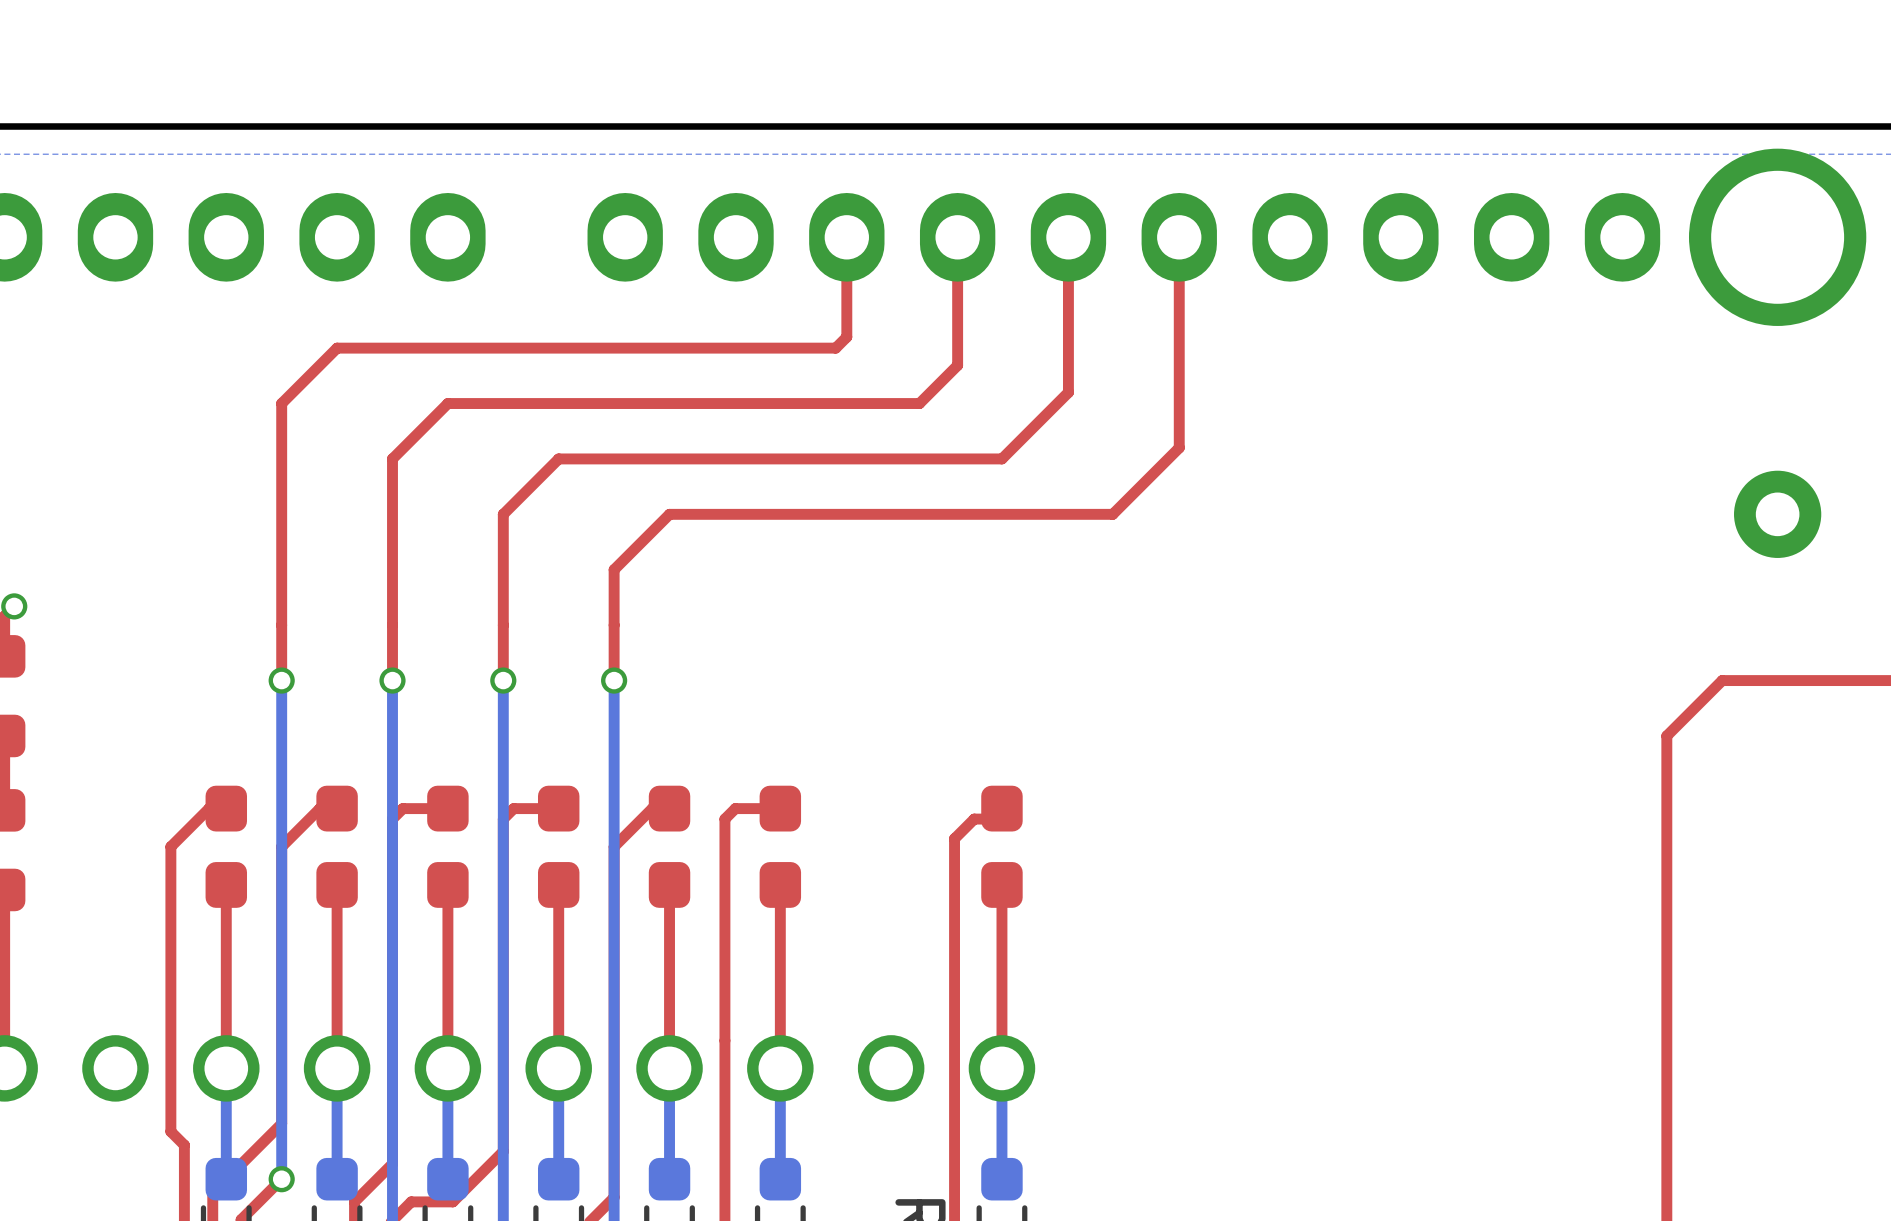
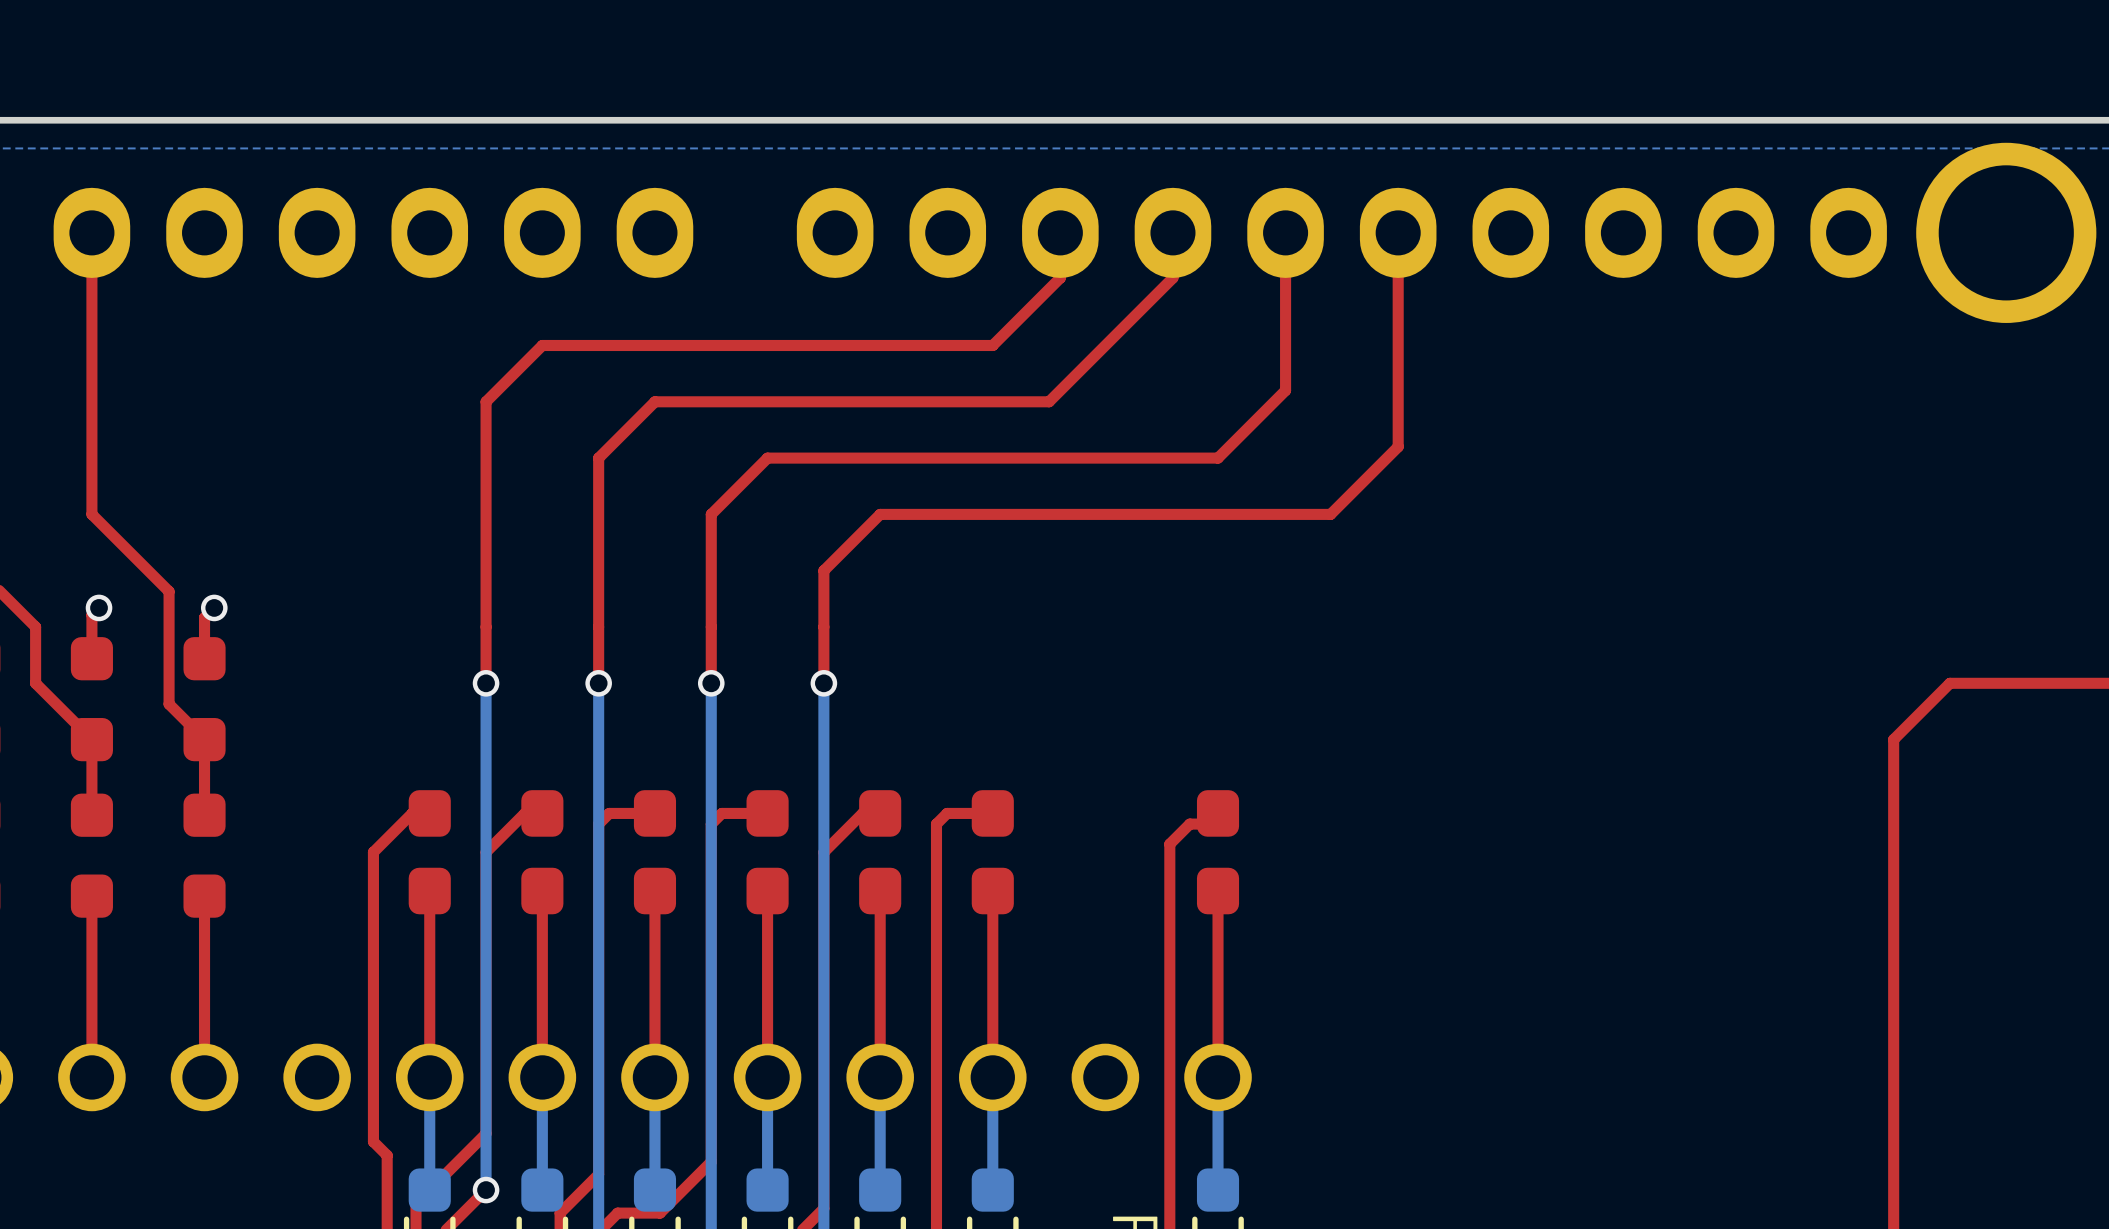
top track: (846, 281) (846, 337) (835, 348) (780, 348) -> (1060, 277) (992, 345)
top track: (957, 281) (957, 365) (919, 403) (835, 403) -> (1172, 277) (1049, 401)
part: (1777, 514) -> none

